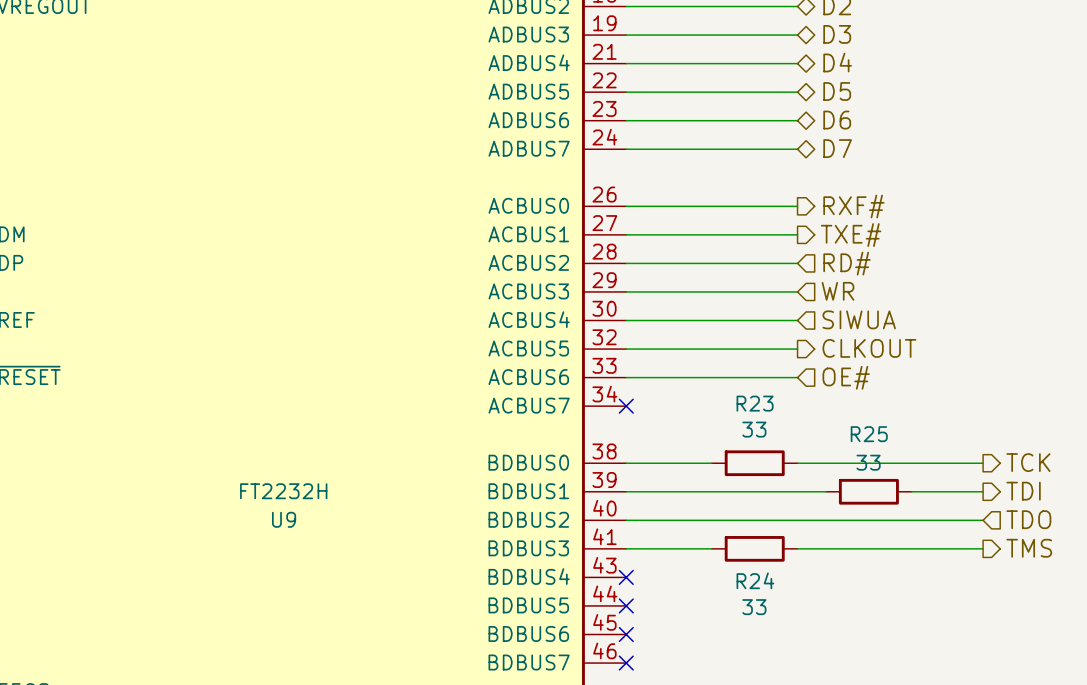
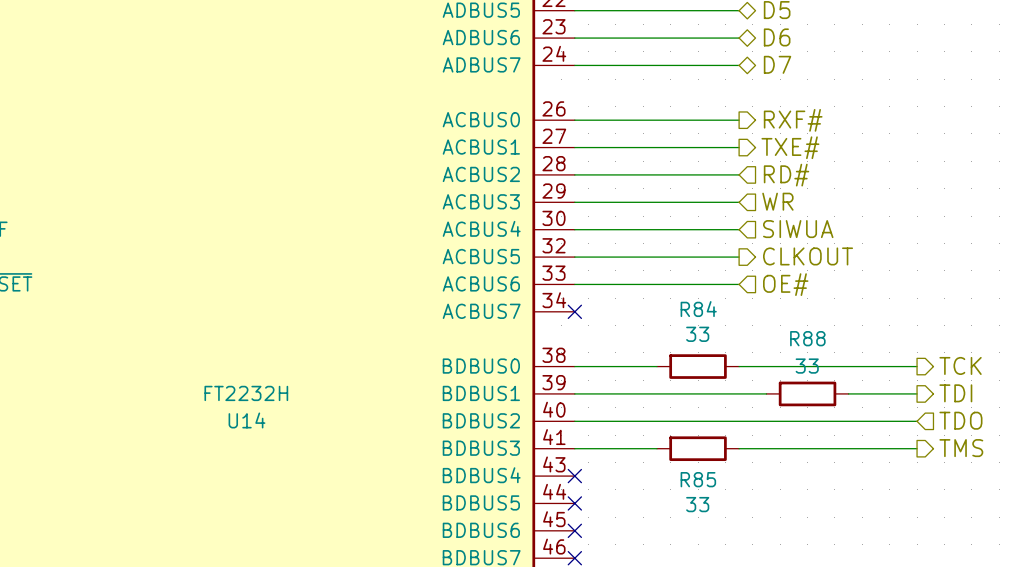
R23 name: R23 (755, 403) -> R84 (698, 309)
R25 name: R25 (869, 434) -> R88 (807, 338)
U9 name: U9 (284, 519) -> U14 (246, 420)
R24 name: R24 (755, 580) -> R85 (698, 479)

